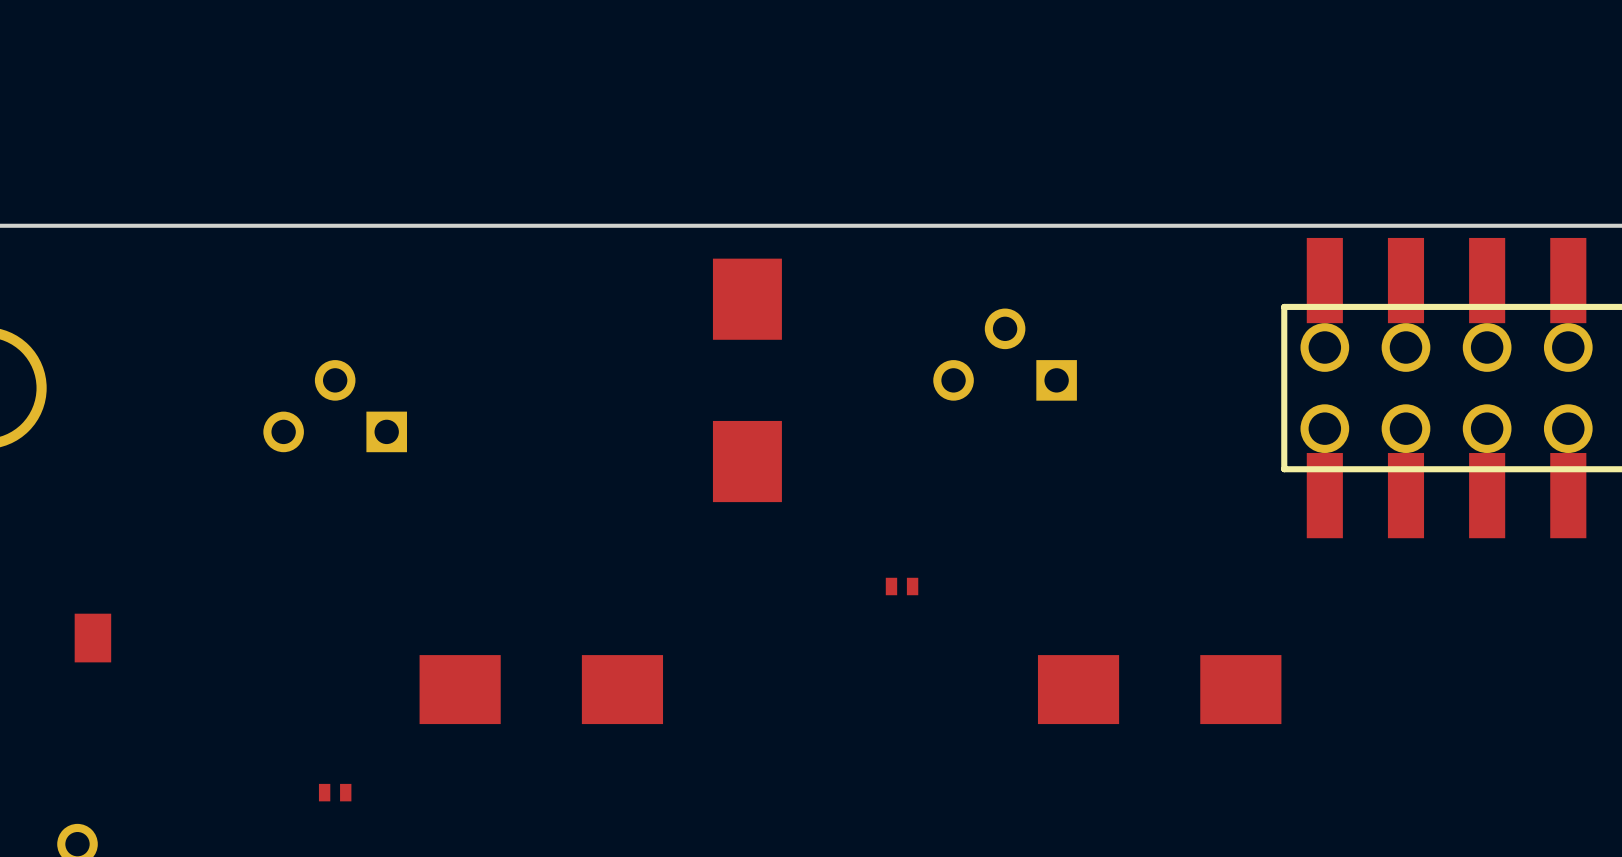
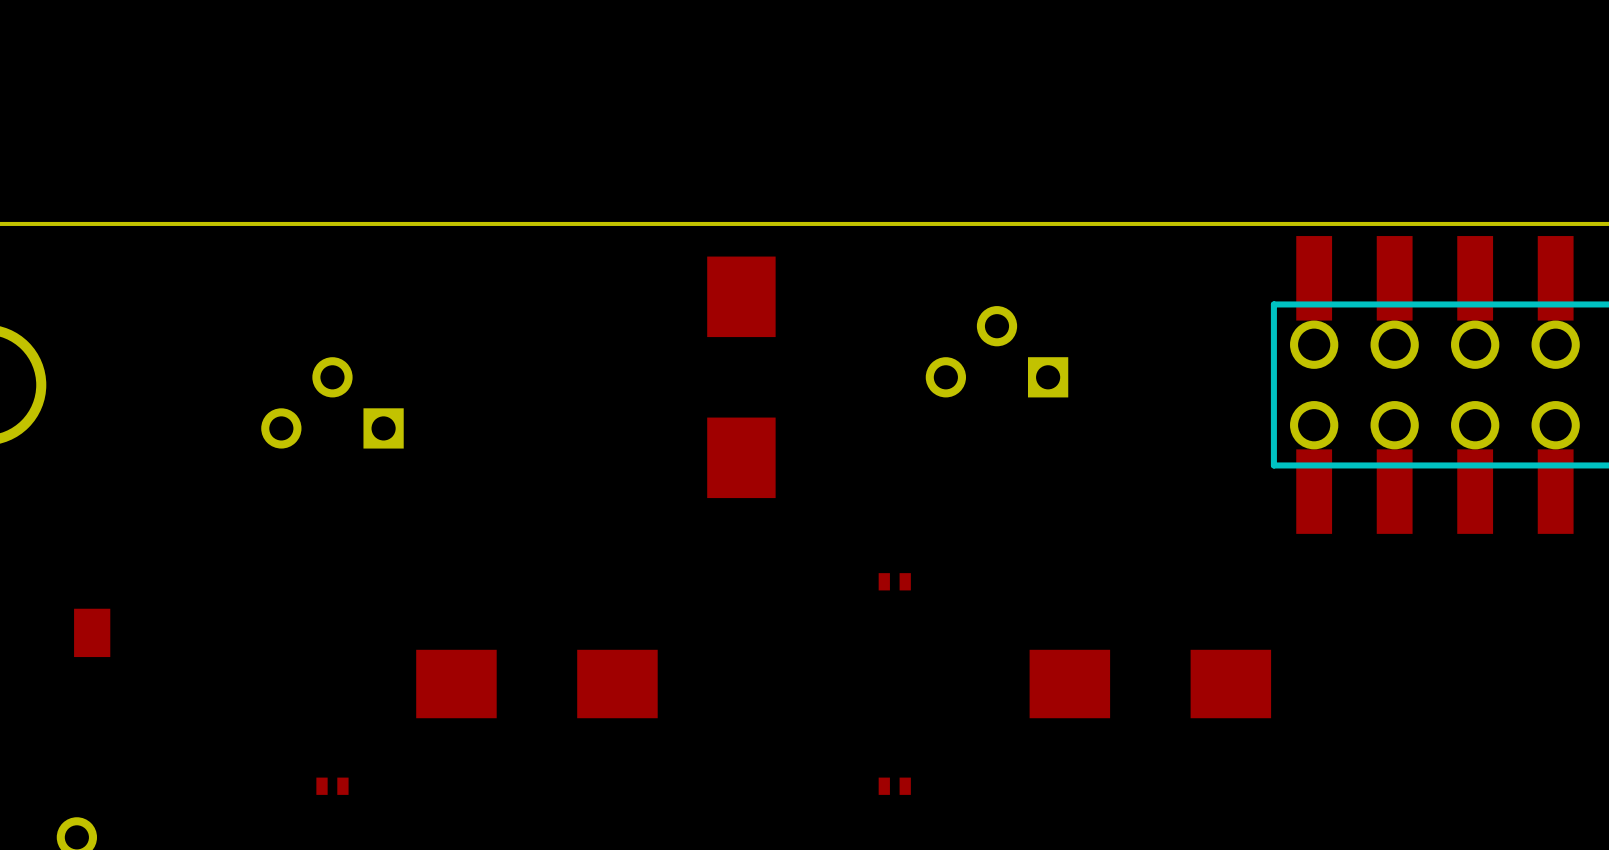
part: none -> (894, 786)

